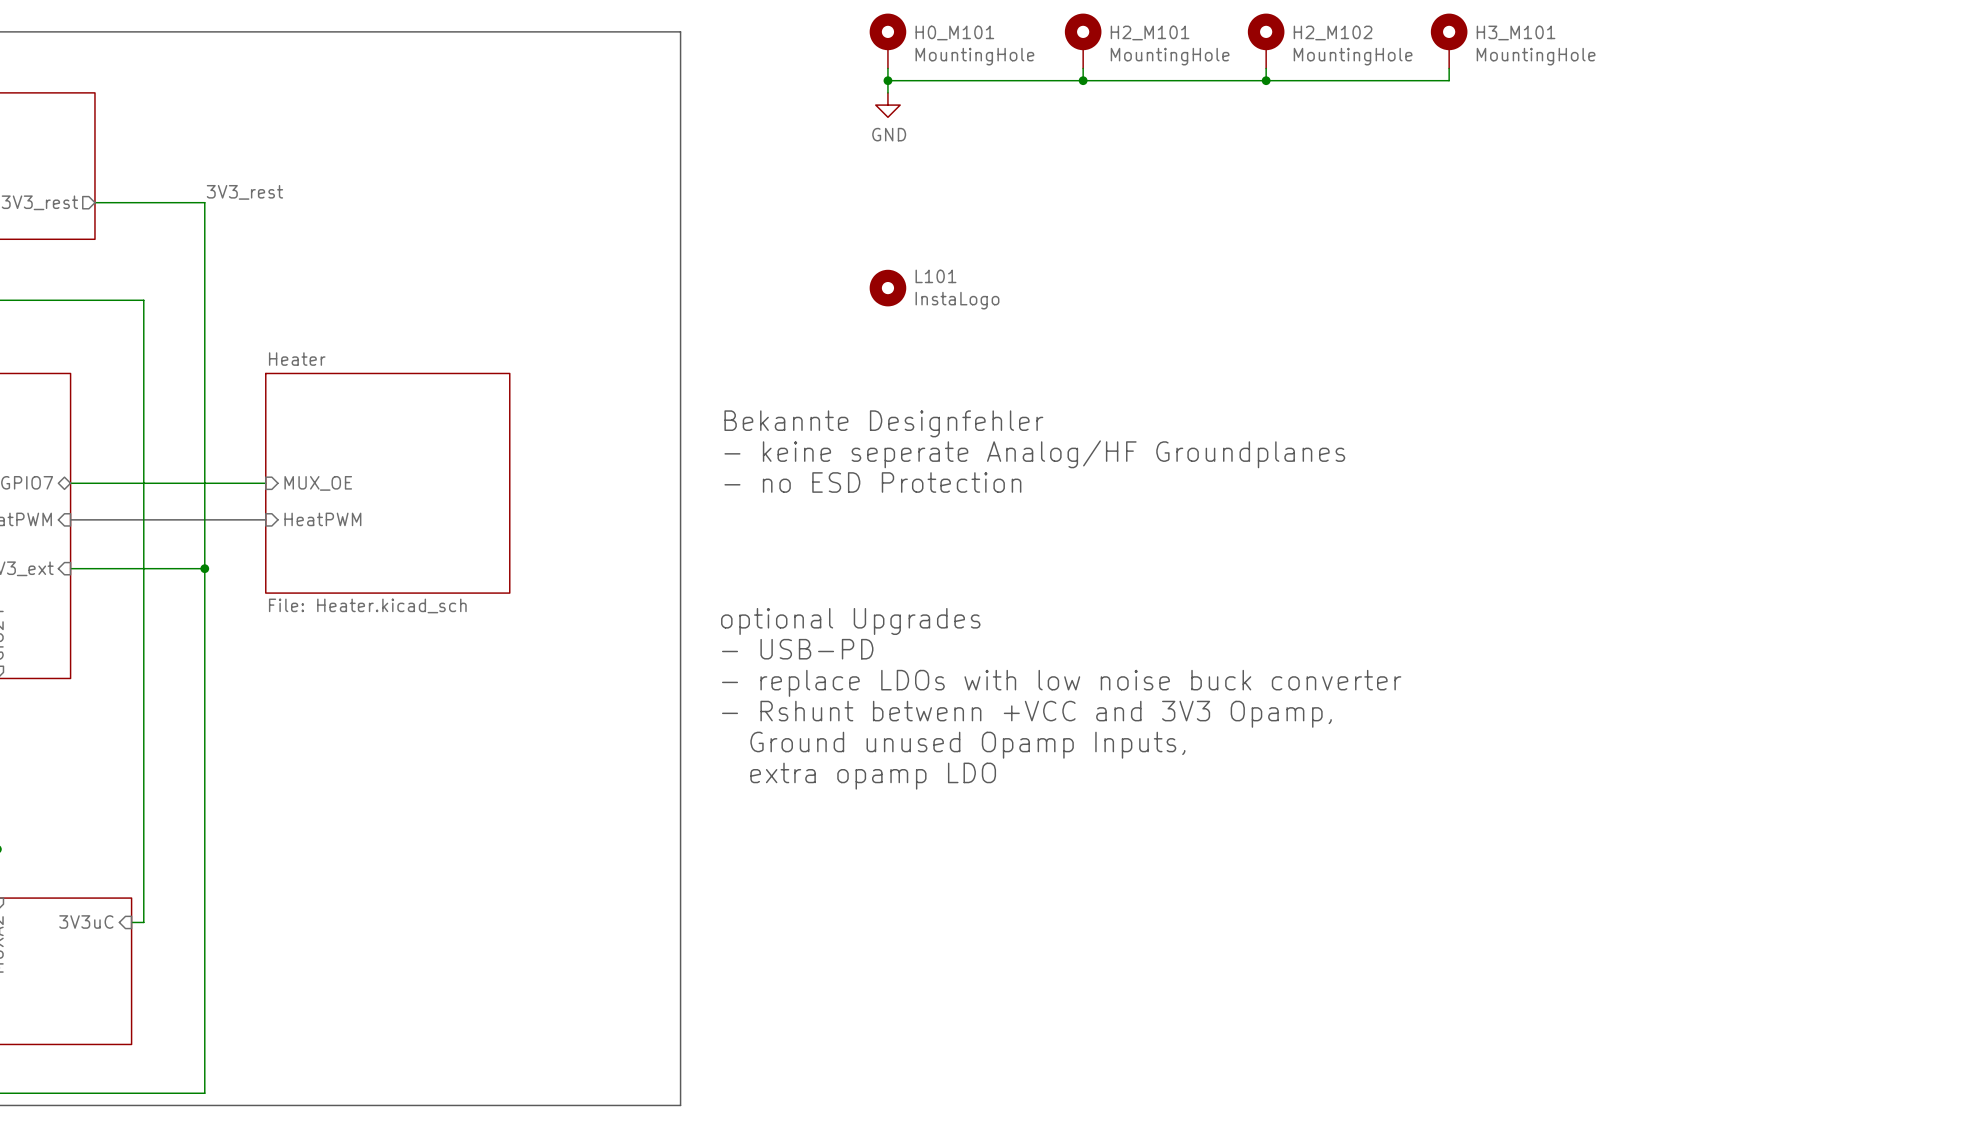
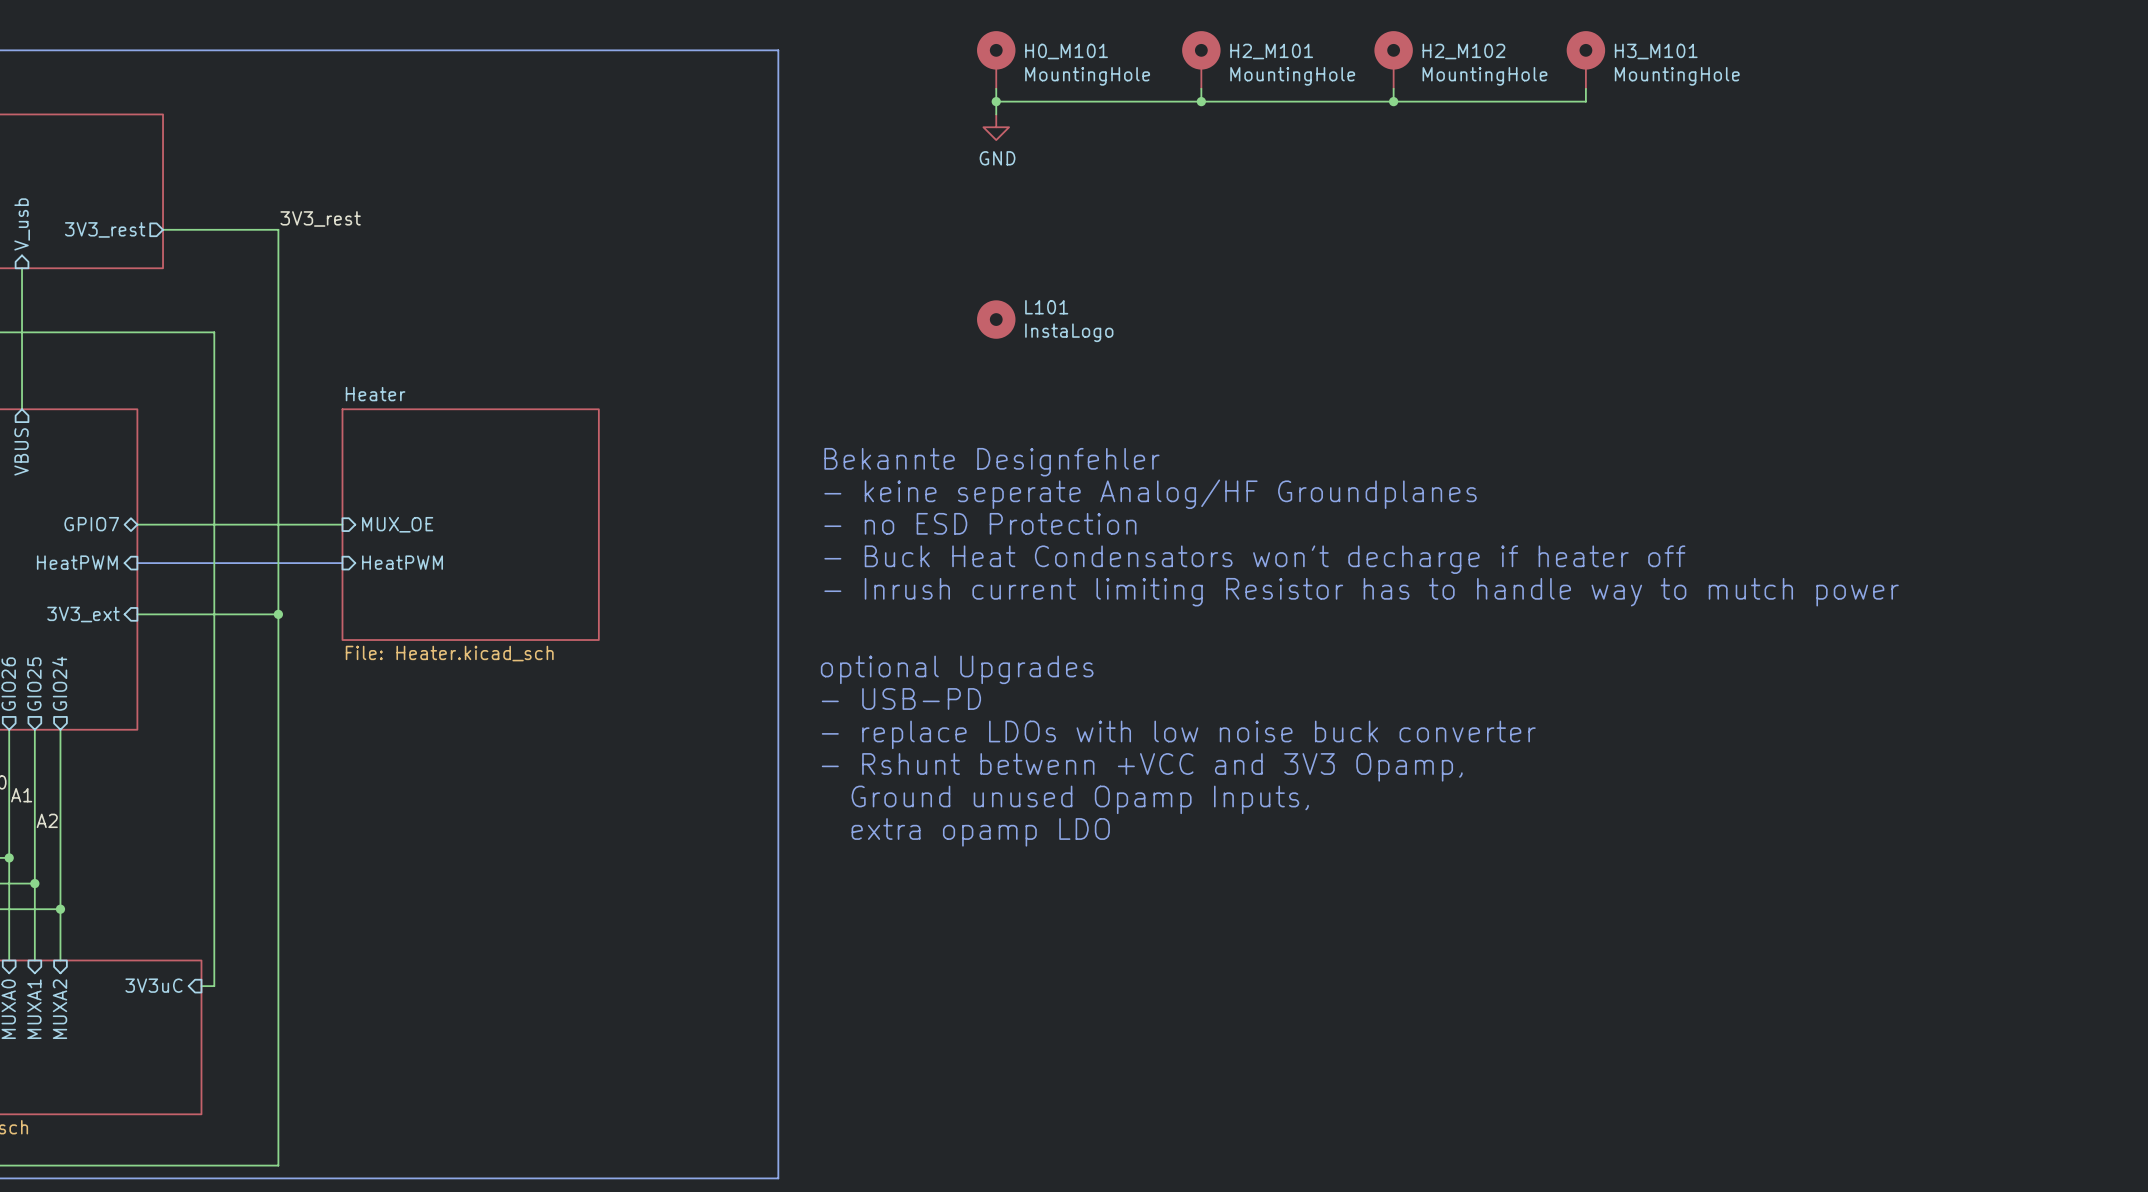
text: none -> - Buck Heat Condensators won't decharge if heater off (1254, 559)
text: none -> - Inrush current limiting Resistor has to handle way to mutch power (1361, 592)

